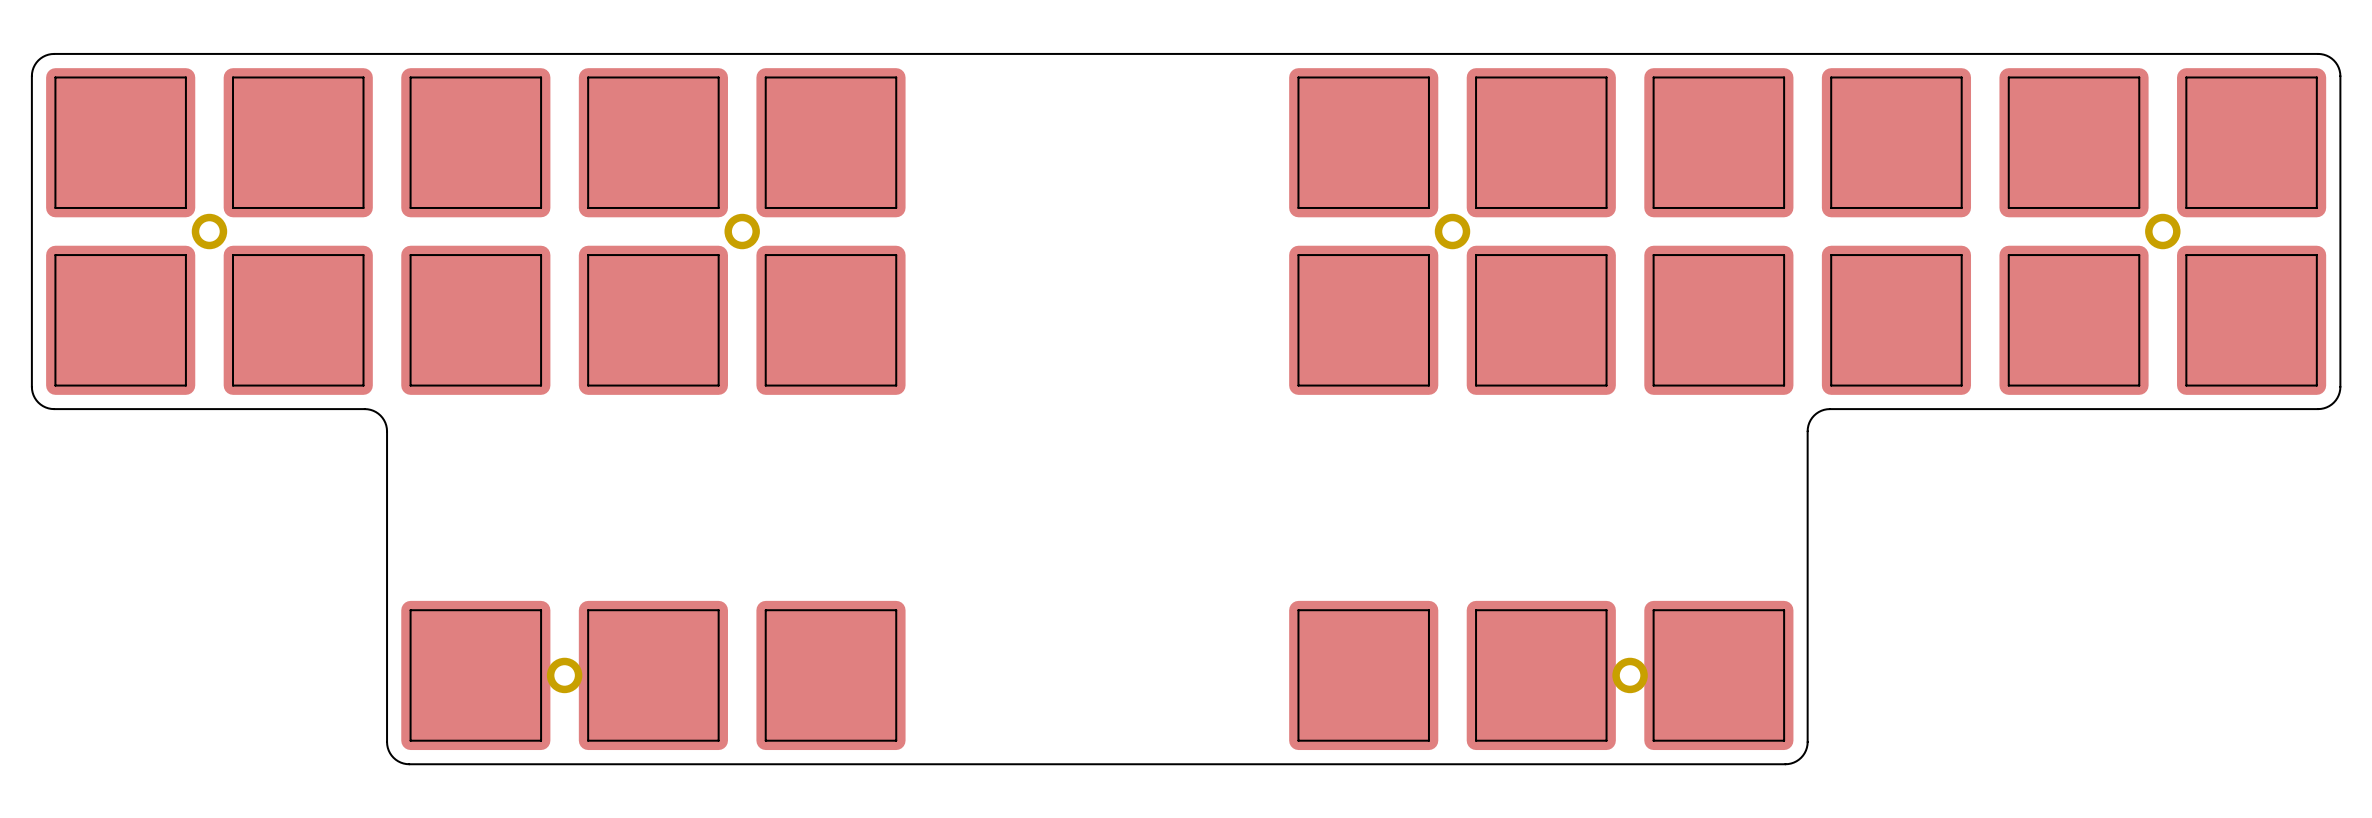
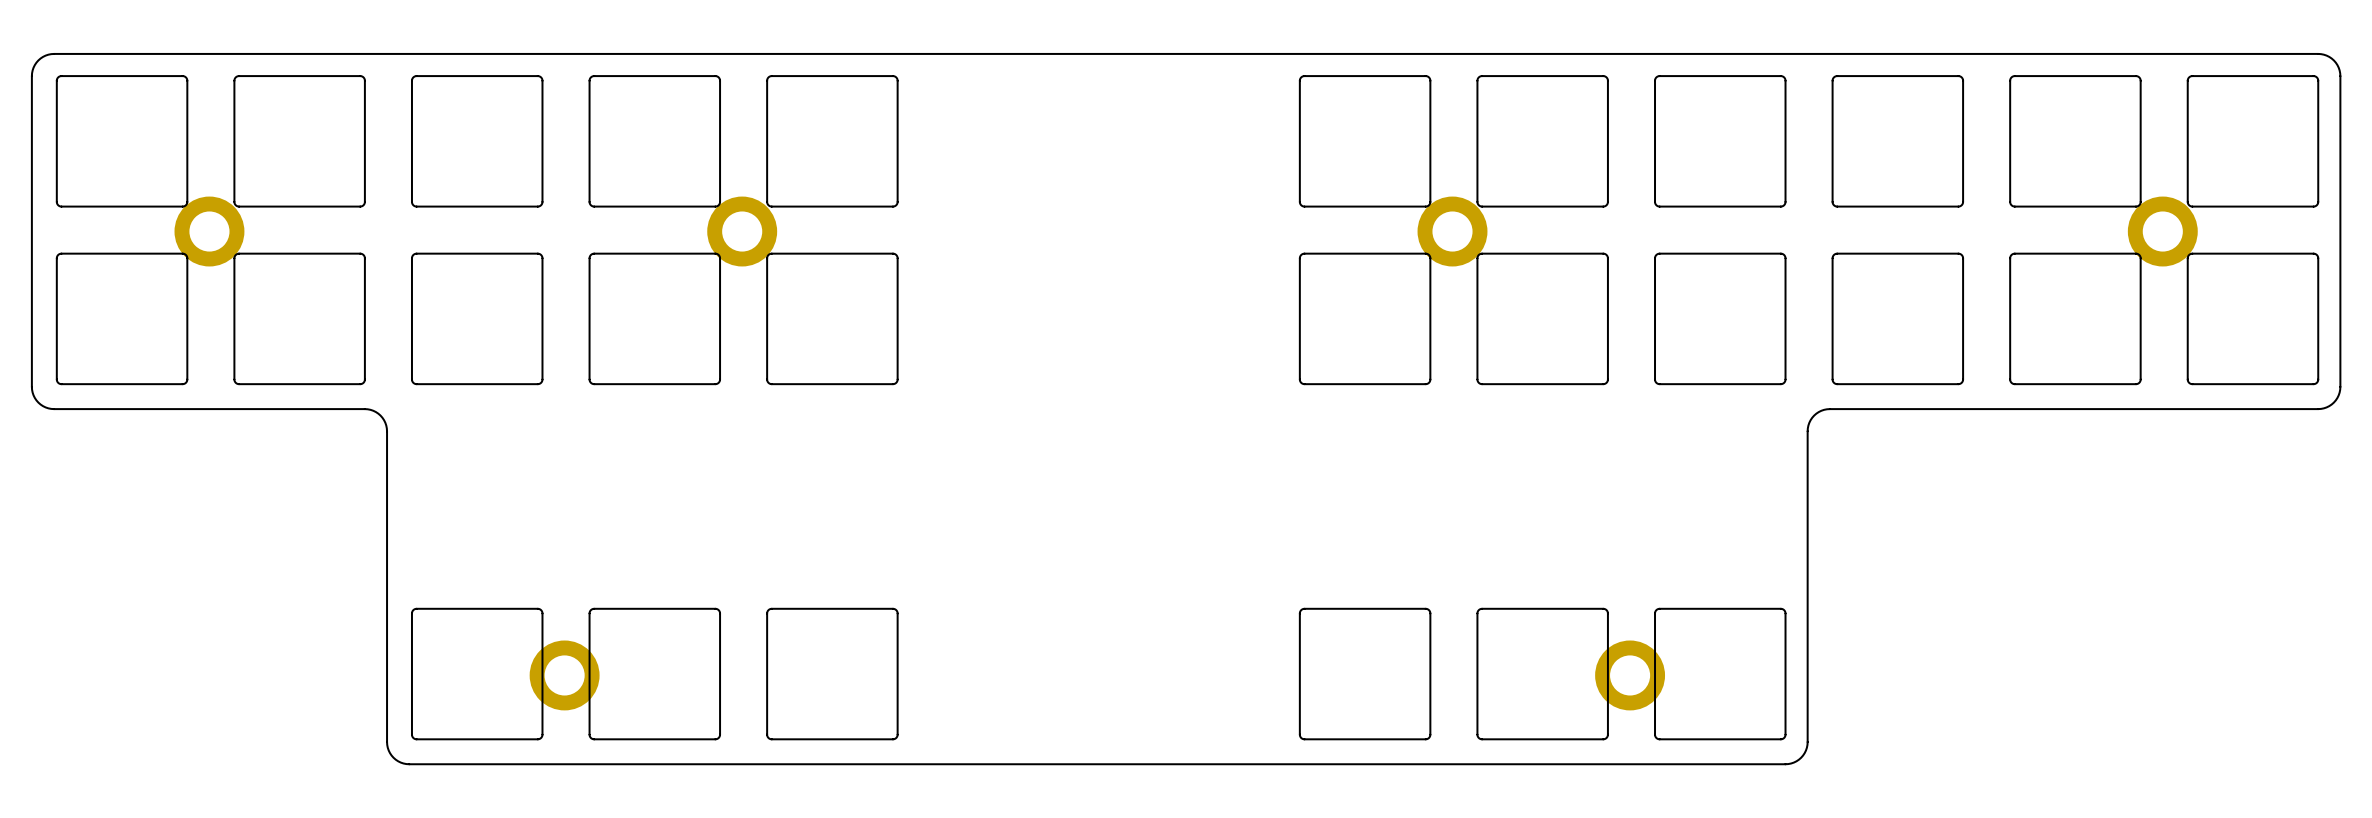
board edge: none -> (61, 76) (185, 77) (185, 205) (58, 205) (56, 80) (61, 76)
board edge: none -> (239, 76) (363, 77) (363, 205) (235, 205) (234, 80) (239, 76)
board edge: none -> (416, 76) (541, 77) (541, 205) (413, 205) (411, 80) (416, 76)
board edge: none -> (594, 76) (718, 77) (718, 205) (590, 205) (589, 80) (594, 76)
board edge: none -> (771, 76) (896, 77) (896, 205) (768, 205) (767, 80) (771, 76)
board edge: none -> (1304, 76) (1428, 77) (1428, 205) (1301, 205) (1299, 80) (1304, 76)
board edge: none -> (1482, 76) (1606, 77) (1606, 205) (1478, 205) (1477, 80) (1482, 76)
board edge: none -> (1659, 76) (1784, 77) (1784, 205) (1656, 205) (1655, 80) (1659, 76)
board edge: none -> (1837, 76) (1961, 77) (1961, 205) (1833, 205) (1832, 80) (1837, 76)
board edge: none -> (2014, 76) (2139, 77) (2139, 205) (2011, 205) (2010, 80) (2014, 76)
board edge: none -> (2192, 76) (2316, 77) (2316, 205) (2189, 205) (2187, 80) (2192, 76)
part: (120, 142) -> none
part: (298, 142) -> none
part: (475, 142) -> none
part: (653, 142) -> none
part: (830, 142) -> none
part: (1363, 142) -> none
part: (1541, 142) -> none
part: (1718, 142) -> none
part: (1896, 142) -> none
part: (2074, 142) -> none
part: (2251, 142) -> none
part footprint: [191, 213, 228, 250] -> [174, 196, 245, 267]
part footprint: [724, 213, 760, 250] -> [707, 196, 778, 267]
part footprint: [1434, 213, 1471, 250] -> [1417, 196, 1488, 267]
part footprint: [2145, 213, 2181, 250] -> [2127, 196, 2198, 267]
board edge: none -> (61, 253) (185, 255) (185, 382) (58, 382) (56, 258) (61, 253)
board edge: none -> (239, 253) (363, 255) (363, 382) (235, 382) (234, 258) (239, 253)
board edge: none -> (416, 253) (541, 255) (541, 382) (413, 382) (411, 258) (416, 253)
board edge: none -> (594, 253) (718, 255) (718, 382) (590, 382) (589, 258) (594, 253)
board edge: none -> (771, 253) (896, 255) (896, 382) (768, 382) (767, 258) (771, 253)
board edge: none -> (1304, 253) (1428, 255) (1428, 382) (1301, 382) (1299, 258) (1304, 253)
board edge: none -> (1482, 253) (1606, 255) (1606, 382) (1478, 382) (1477, 258) (1482, 253)
board edge: none -> (1659, 253) (1784, 255) (1784, 382) (1656, 382) (1655, 258) (1659, 253)
board edge: none -> (1837, 253) (1961, 255) (1961, 382) (1833, 382) (1832, 258) (1837, 253)
board edge: none -> (2014, 253) (2139, 255) (2139, 382) (2011, 382) (2010, 258) (2014, 253)
board edge: none -> (2192, 253) (2316, 255) (2316, 382) (2189, 382) (2187, 258) (2192, 253)
part: (120, 320) -> none
part: (298, 320) -> none
part: (475, 320) -> none
part: (653, 320) -> none
part: (830, 320) -> none
part: (1363, 320) -> none
part: (1541, 320) -> none
part: (1718, 320) -> none
part: (1896, 320) -> none
part: (2074, 320) -> none
part: (2251, 320) -> none
board edge: none -> (416, 608) (541, 610) (541, 737) (413, 737) (411, 613) (416, 608)
board edge: none -> (594, 608) (718, 610) (718, 737) (590, 737) (589, 613) (594, 608)
board edge: none -> (771, 608) (896, 610) (896, 737) (768, 737) (767, 613) (771, 608)
board edge: none -> (1304, 608) (1428, 610) (1428, 737) (1301, 737) (1299, 613) (1304, 608)
board edge: none -> (1482, 608) (1606, 610) (1606, 737) (1478, 737) (1477, 613) (1482, 608)
board edge: none -> (1659, 608) (1784, 610) (1784, 737) (1656, 737) (1655, 613) (1659, 608)
part footprint: [546, 657, 583, 694] -> [529, 640, 600, 711]
part footprint: [1612, 657, 1648, 694] -> [1595, 640, 1666, 711]
part: (475, 675) -> none
part: (653, 675) -> none
part: (830, 675) -> none
part: (1363, 675) -> none
part: (1541, 675) -> none
part: (1718, 675) -> none

